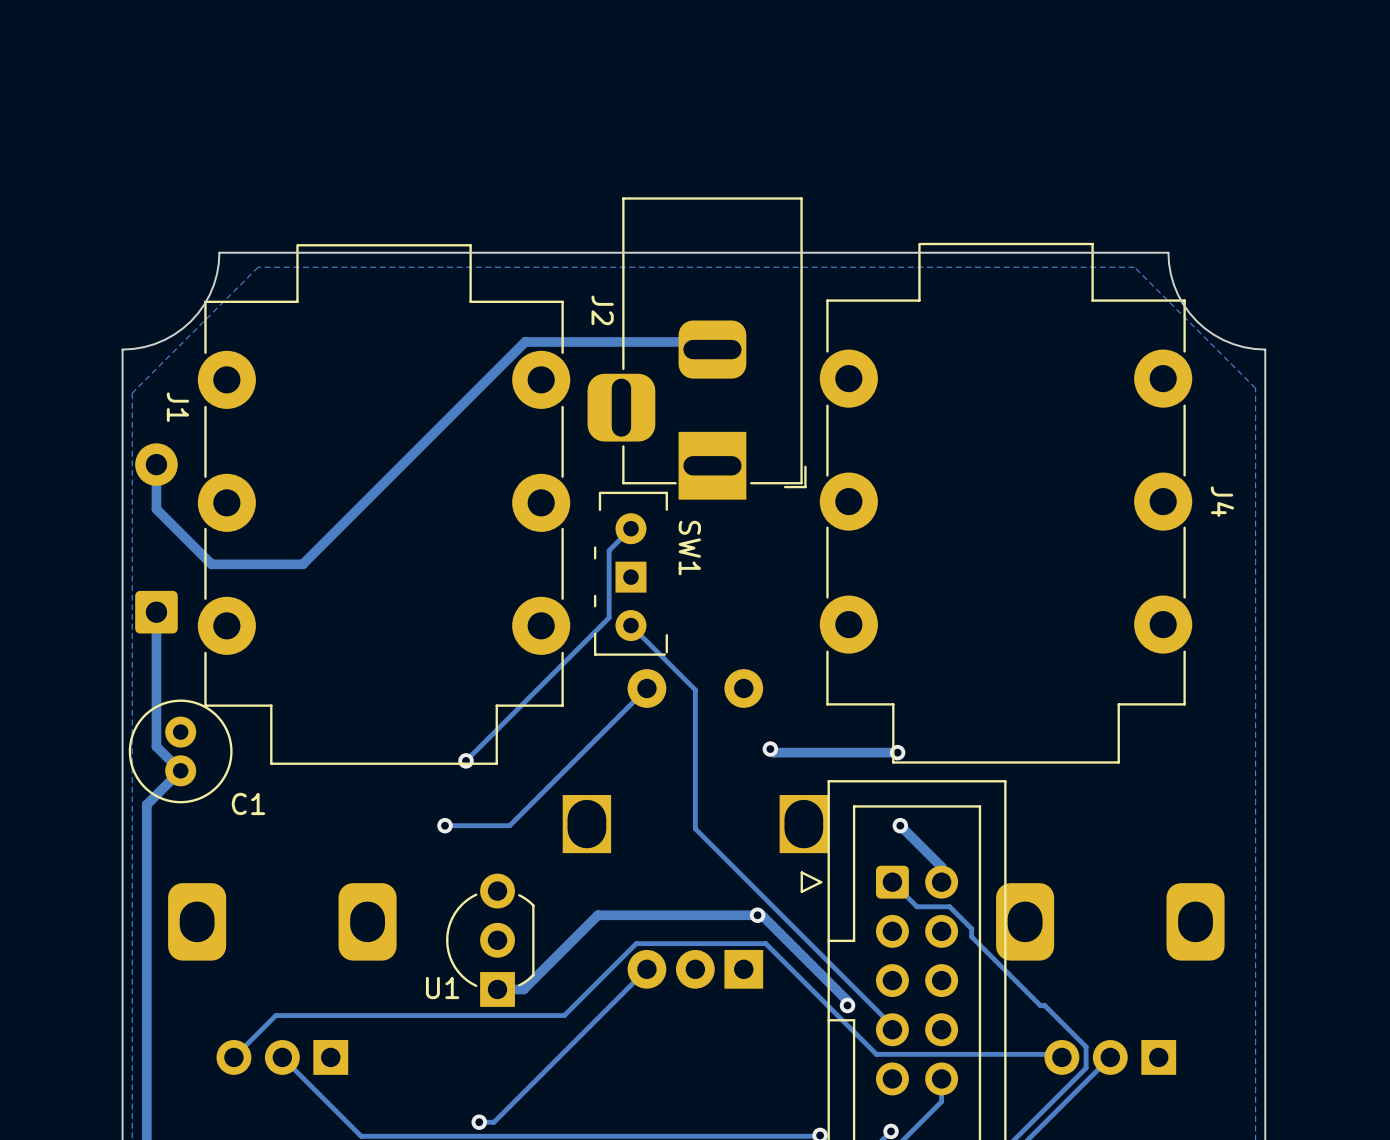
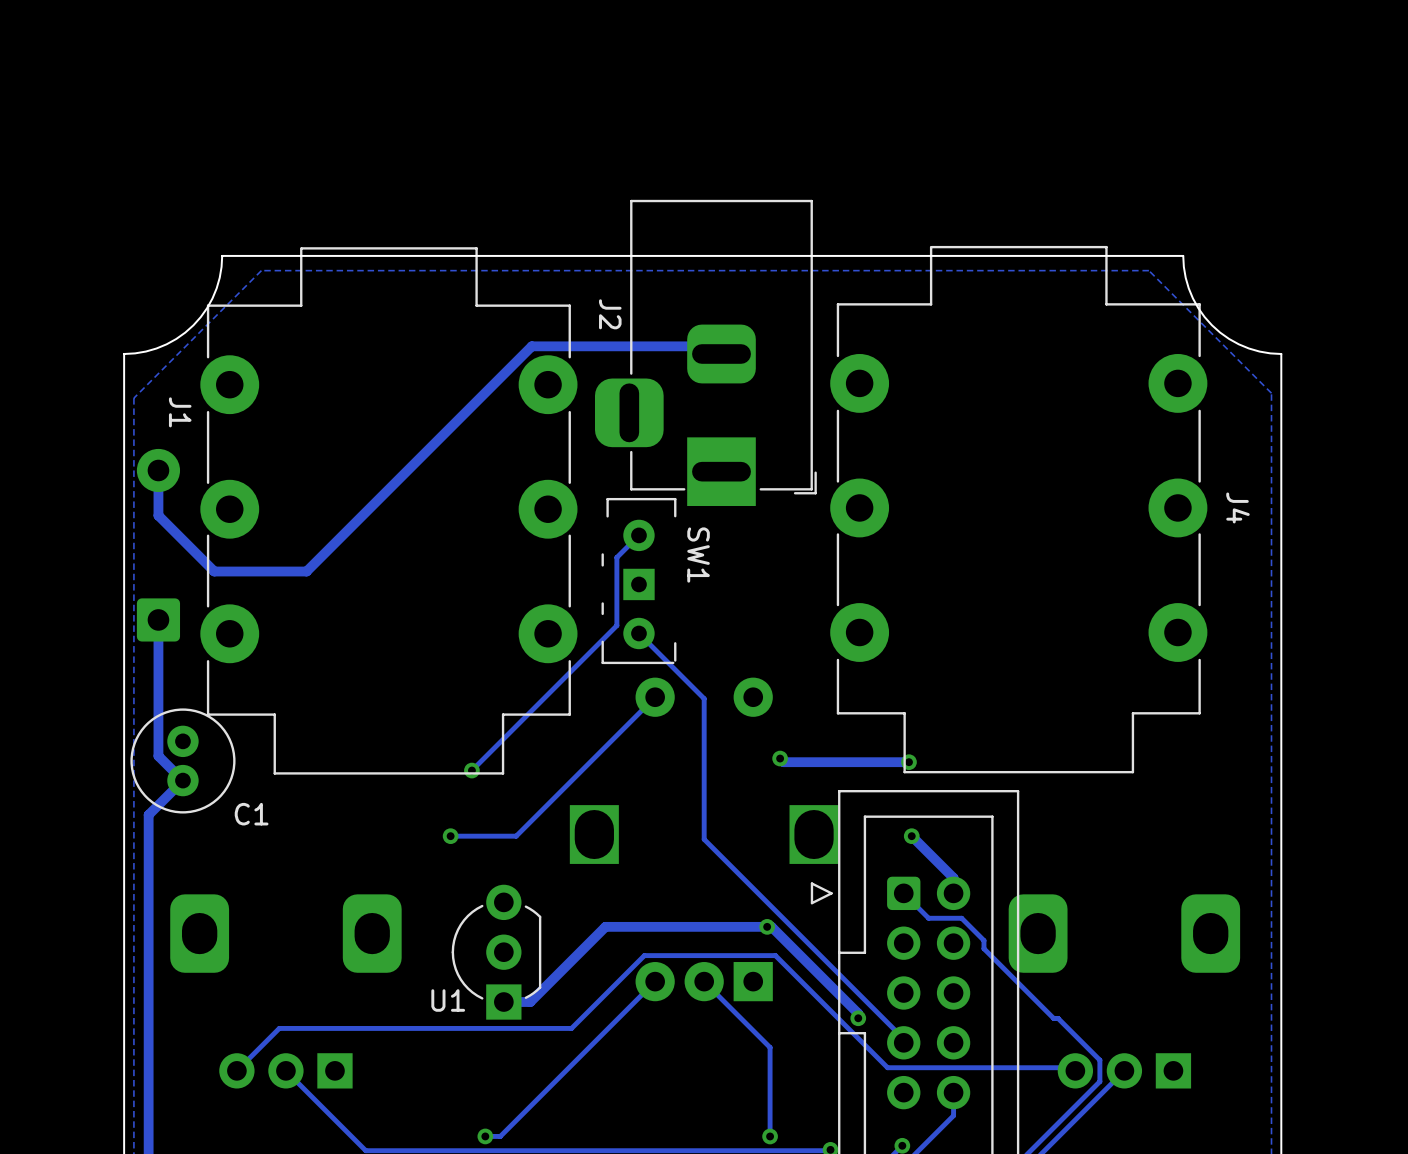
track: none -> (704, 981) (770, 1047) (770, 1136)
via: none -> (770, 1136)

